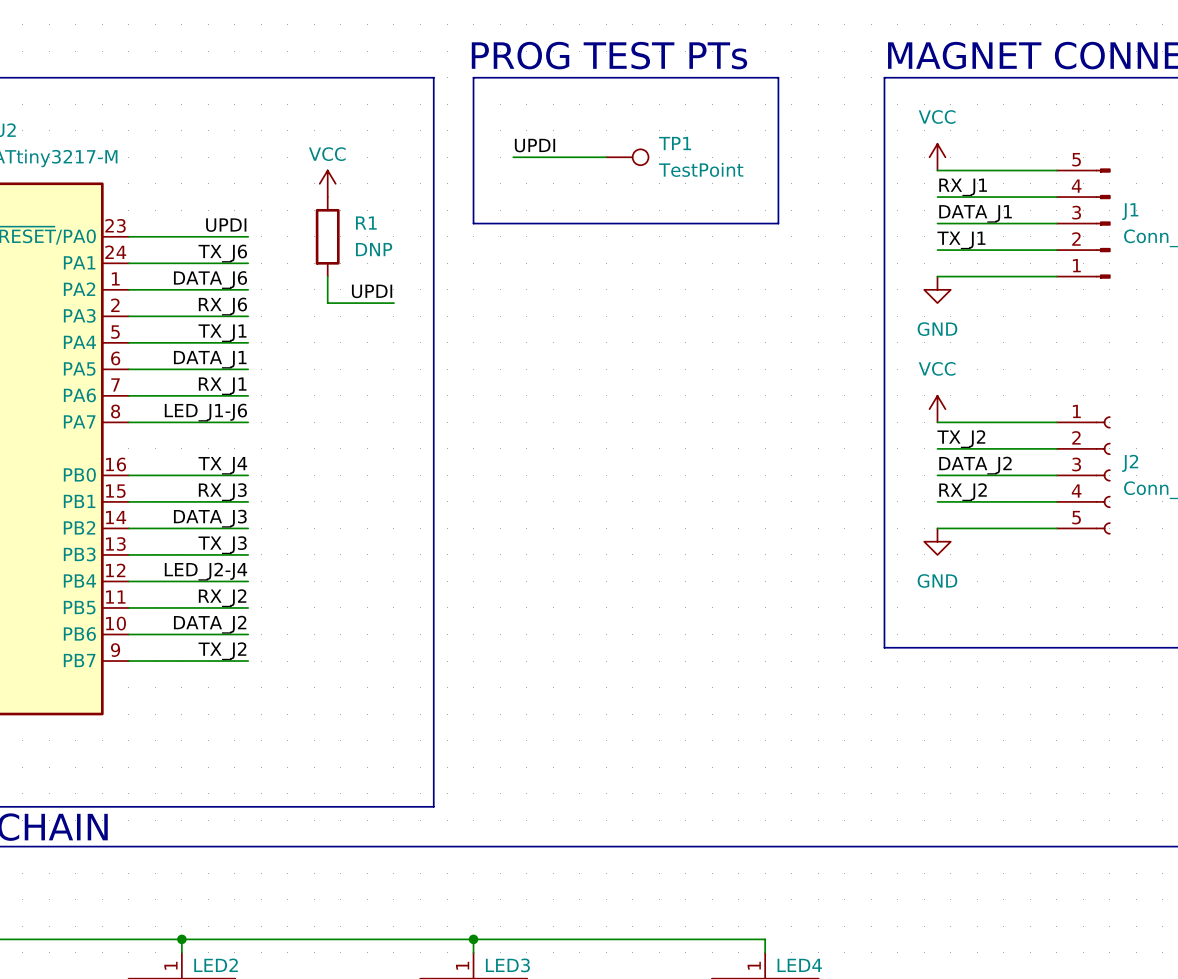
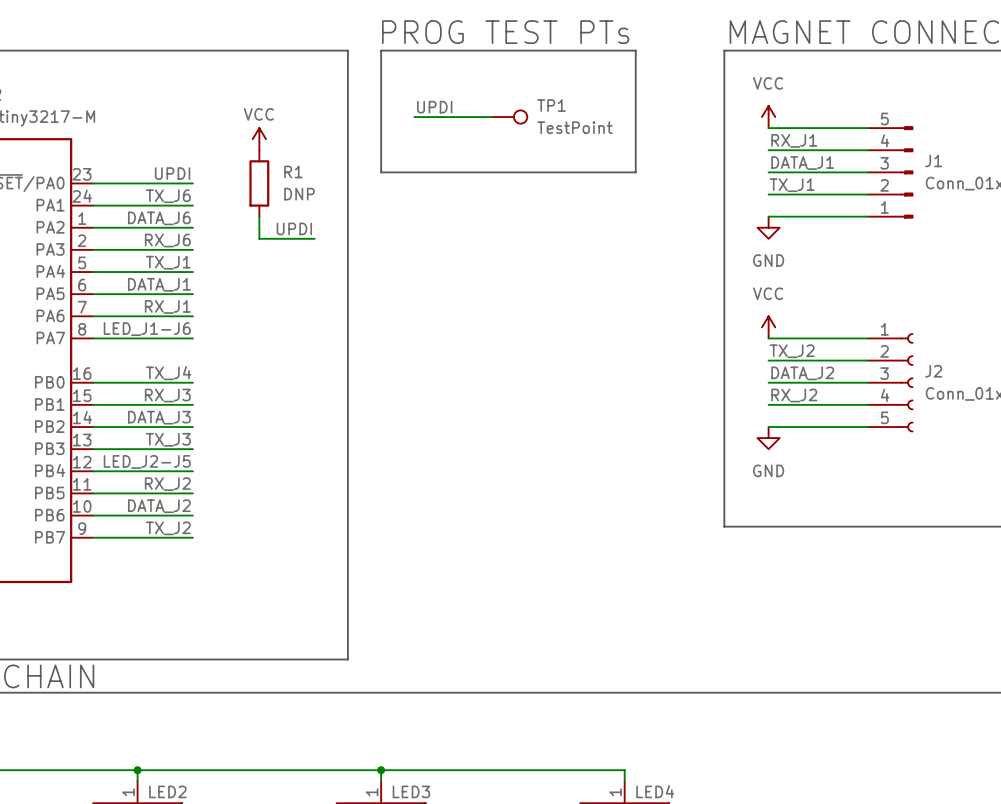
label: LED_J2-J4 (205, 571) -> LED_J2-J5 (147, 461)

